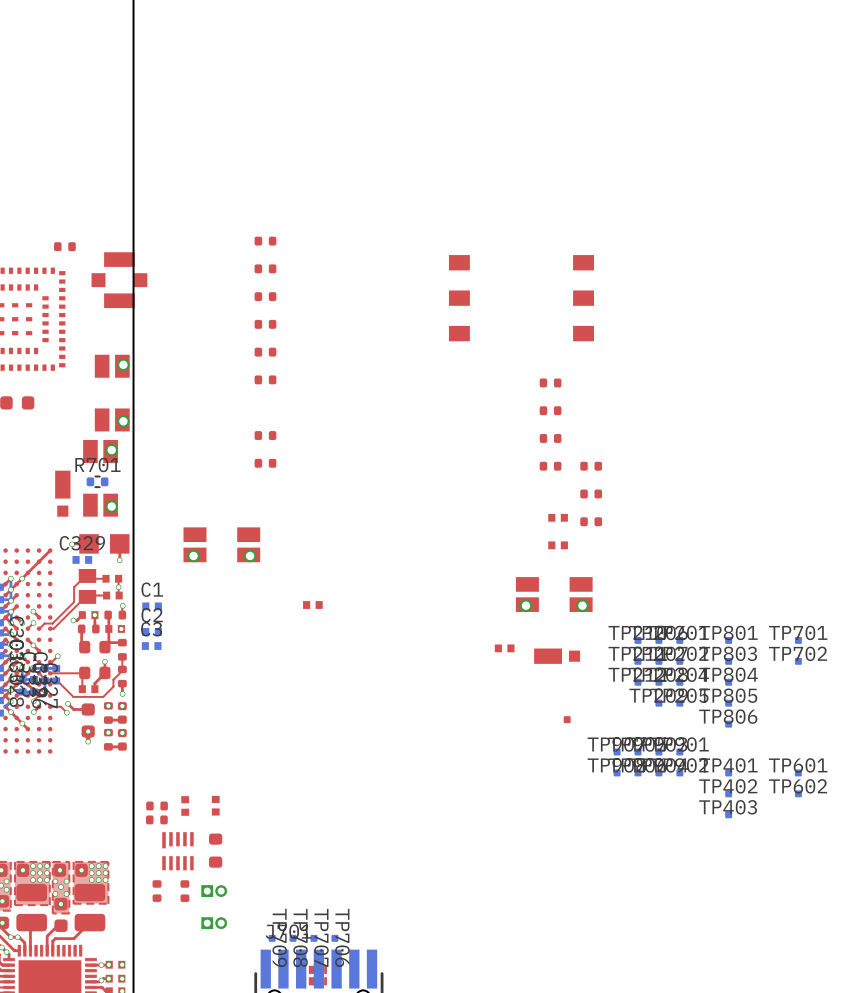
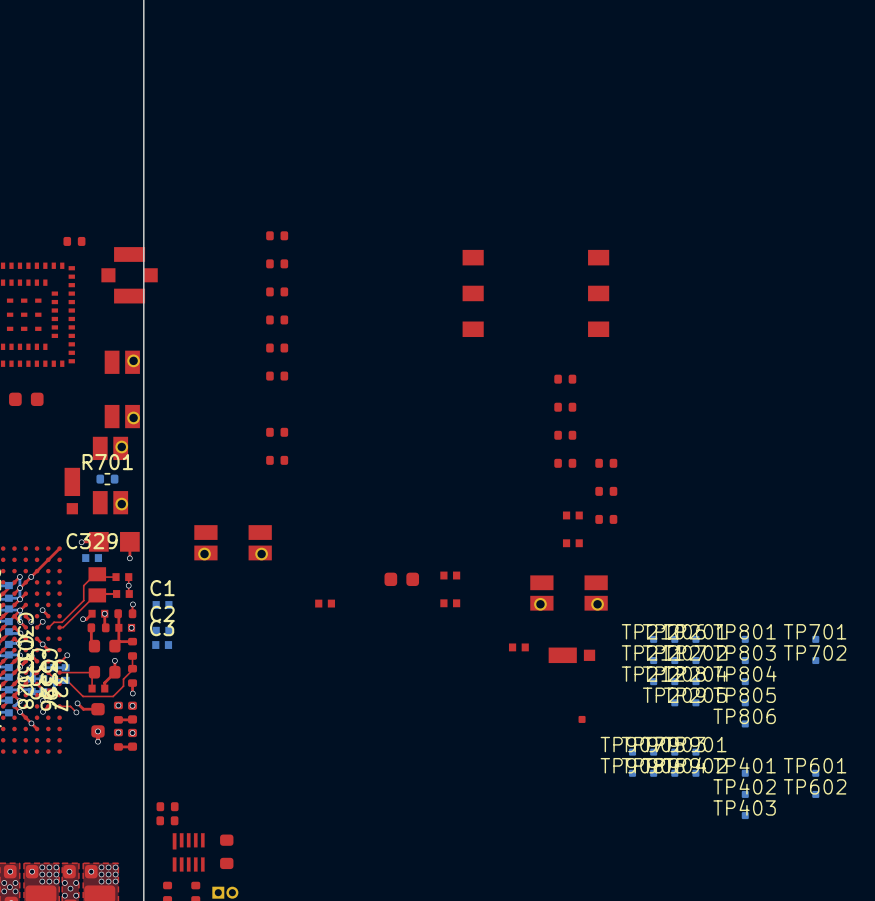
part: none -> (450, 575)
part: none -> (401, 579)
part: none -> (450, 603)
part: (185, 805) -> none
part: (215, 805) -> none

